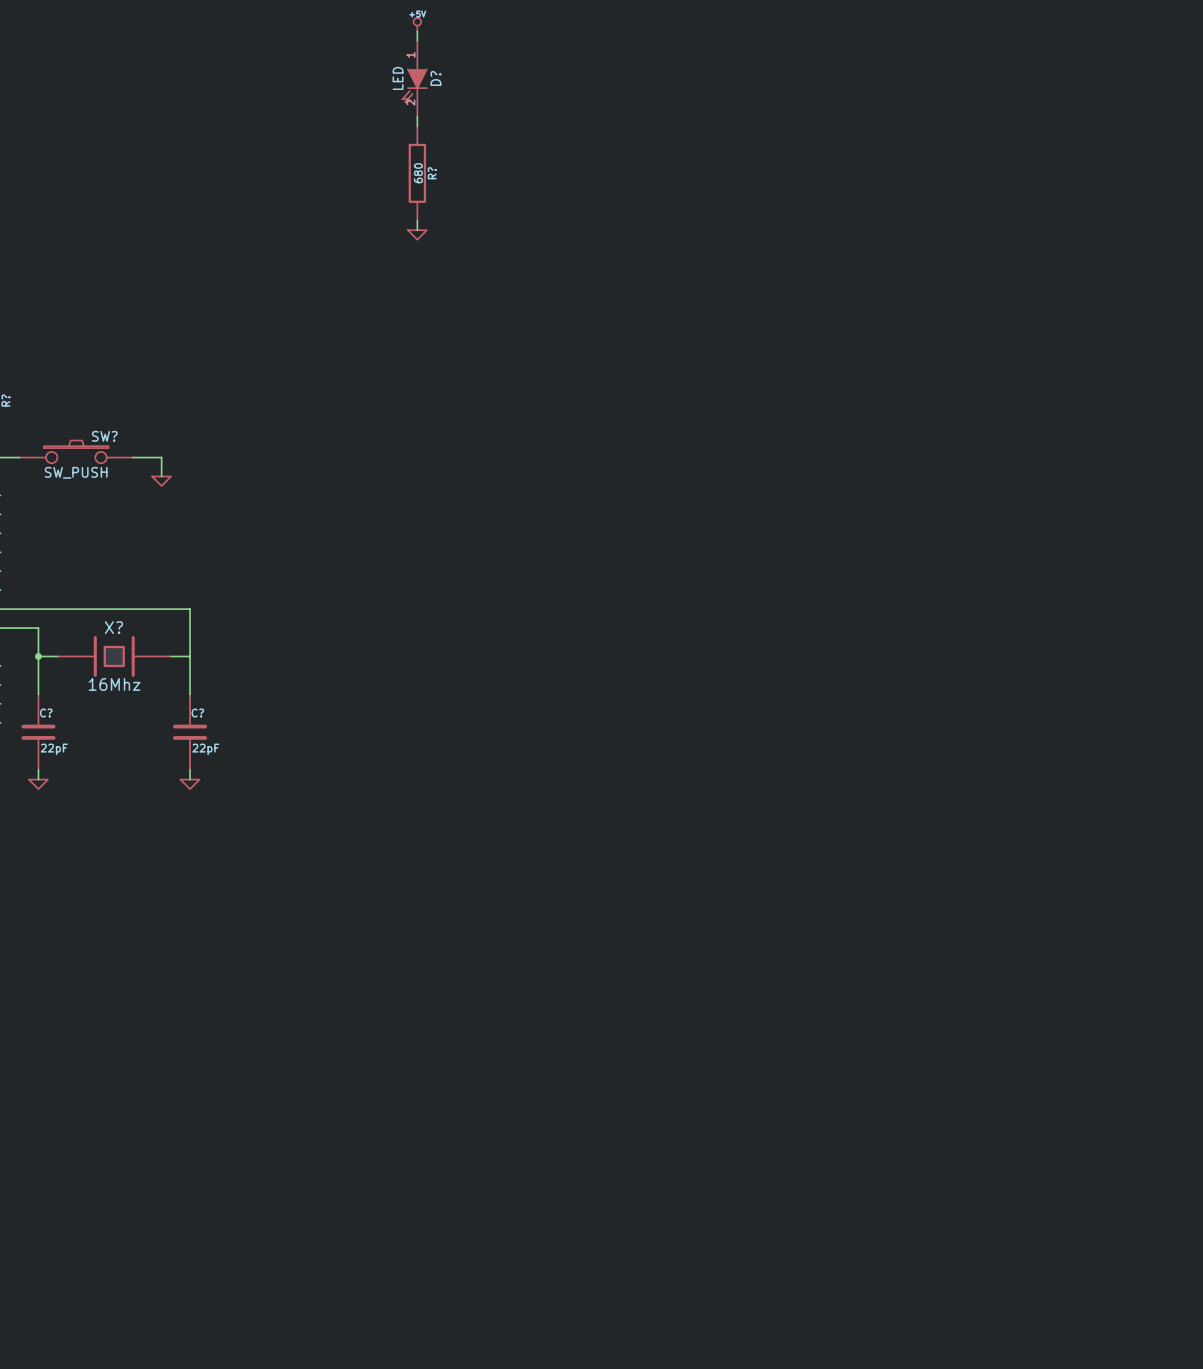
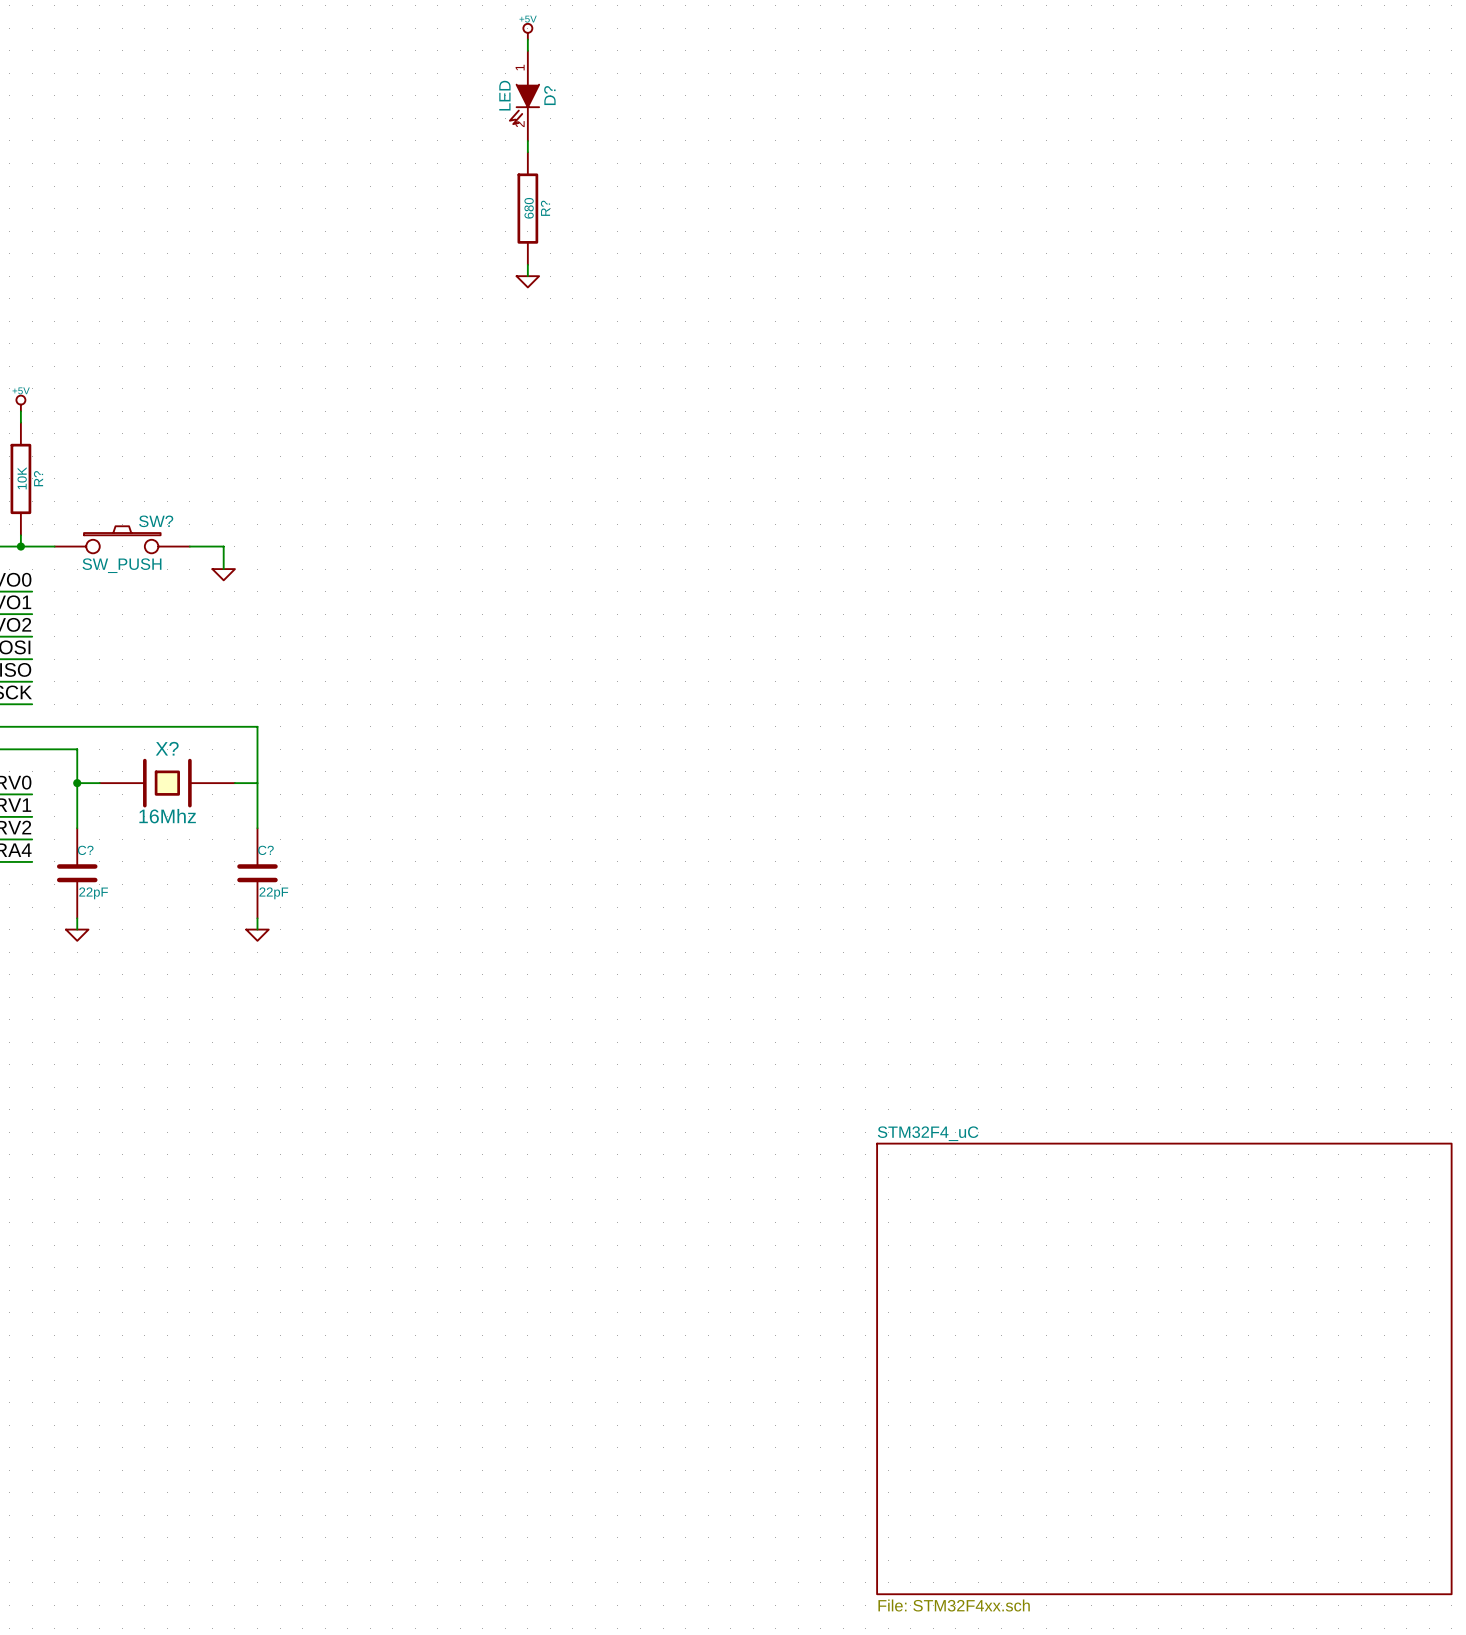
sheet STM32F4_uC: none -> File: STM32F4xx.sch (1164, 1368)

